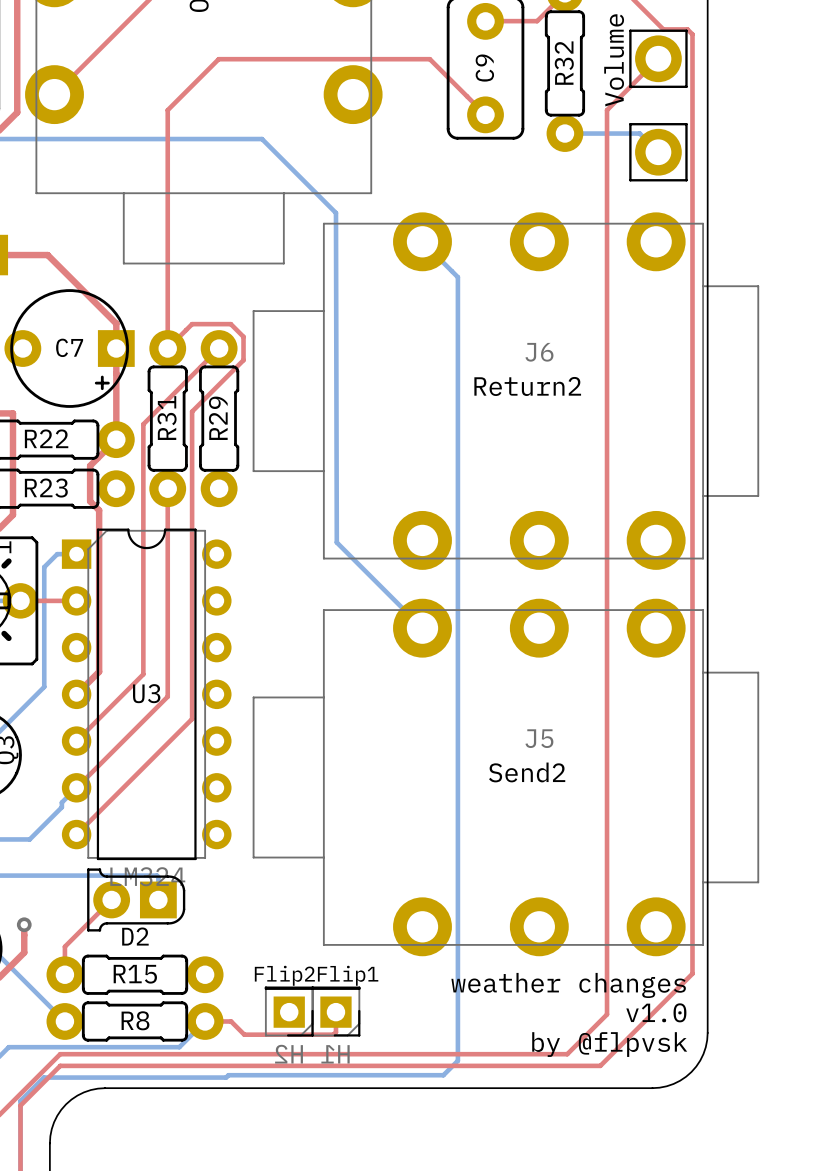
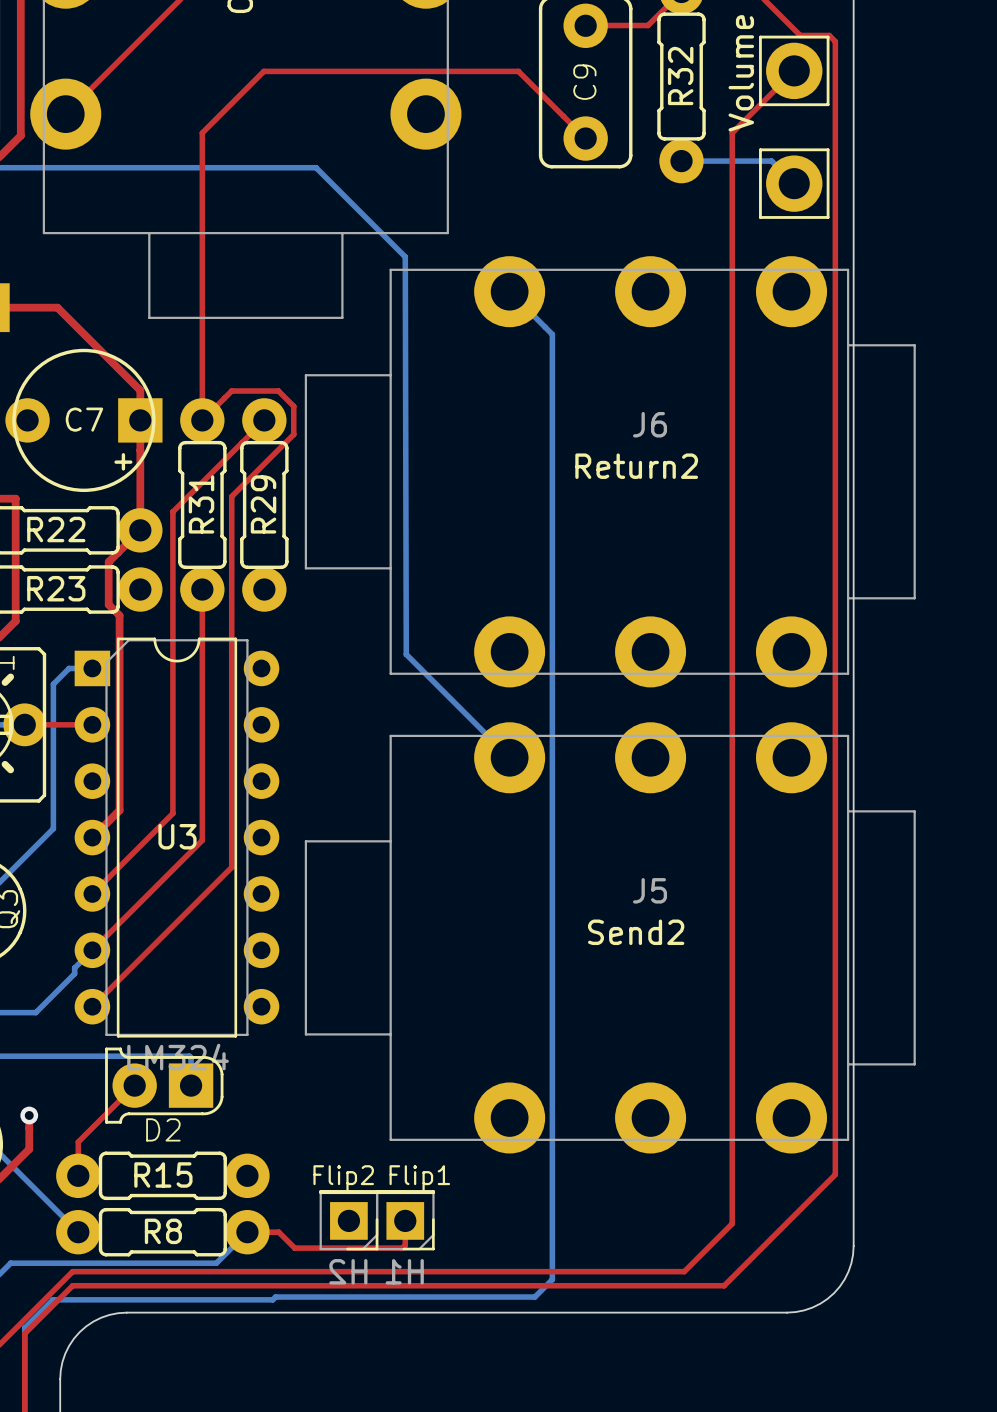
text: weather changes (568, 985) -> none
text: v1.0 (656, 1012) -> none
text: by @flpvsk (609, 1044) -> none

